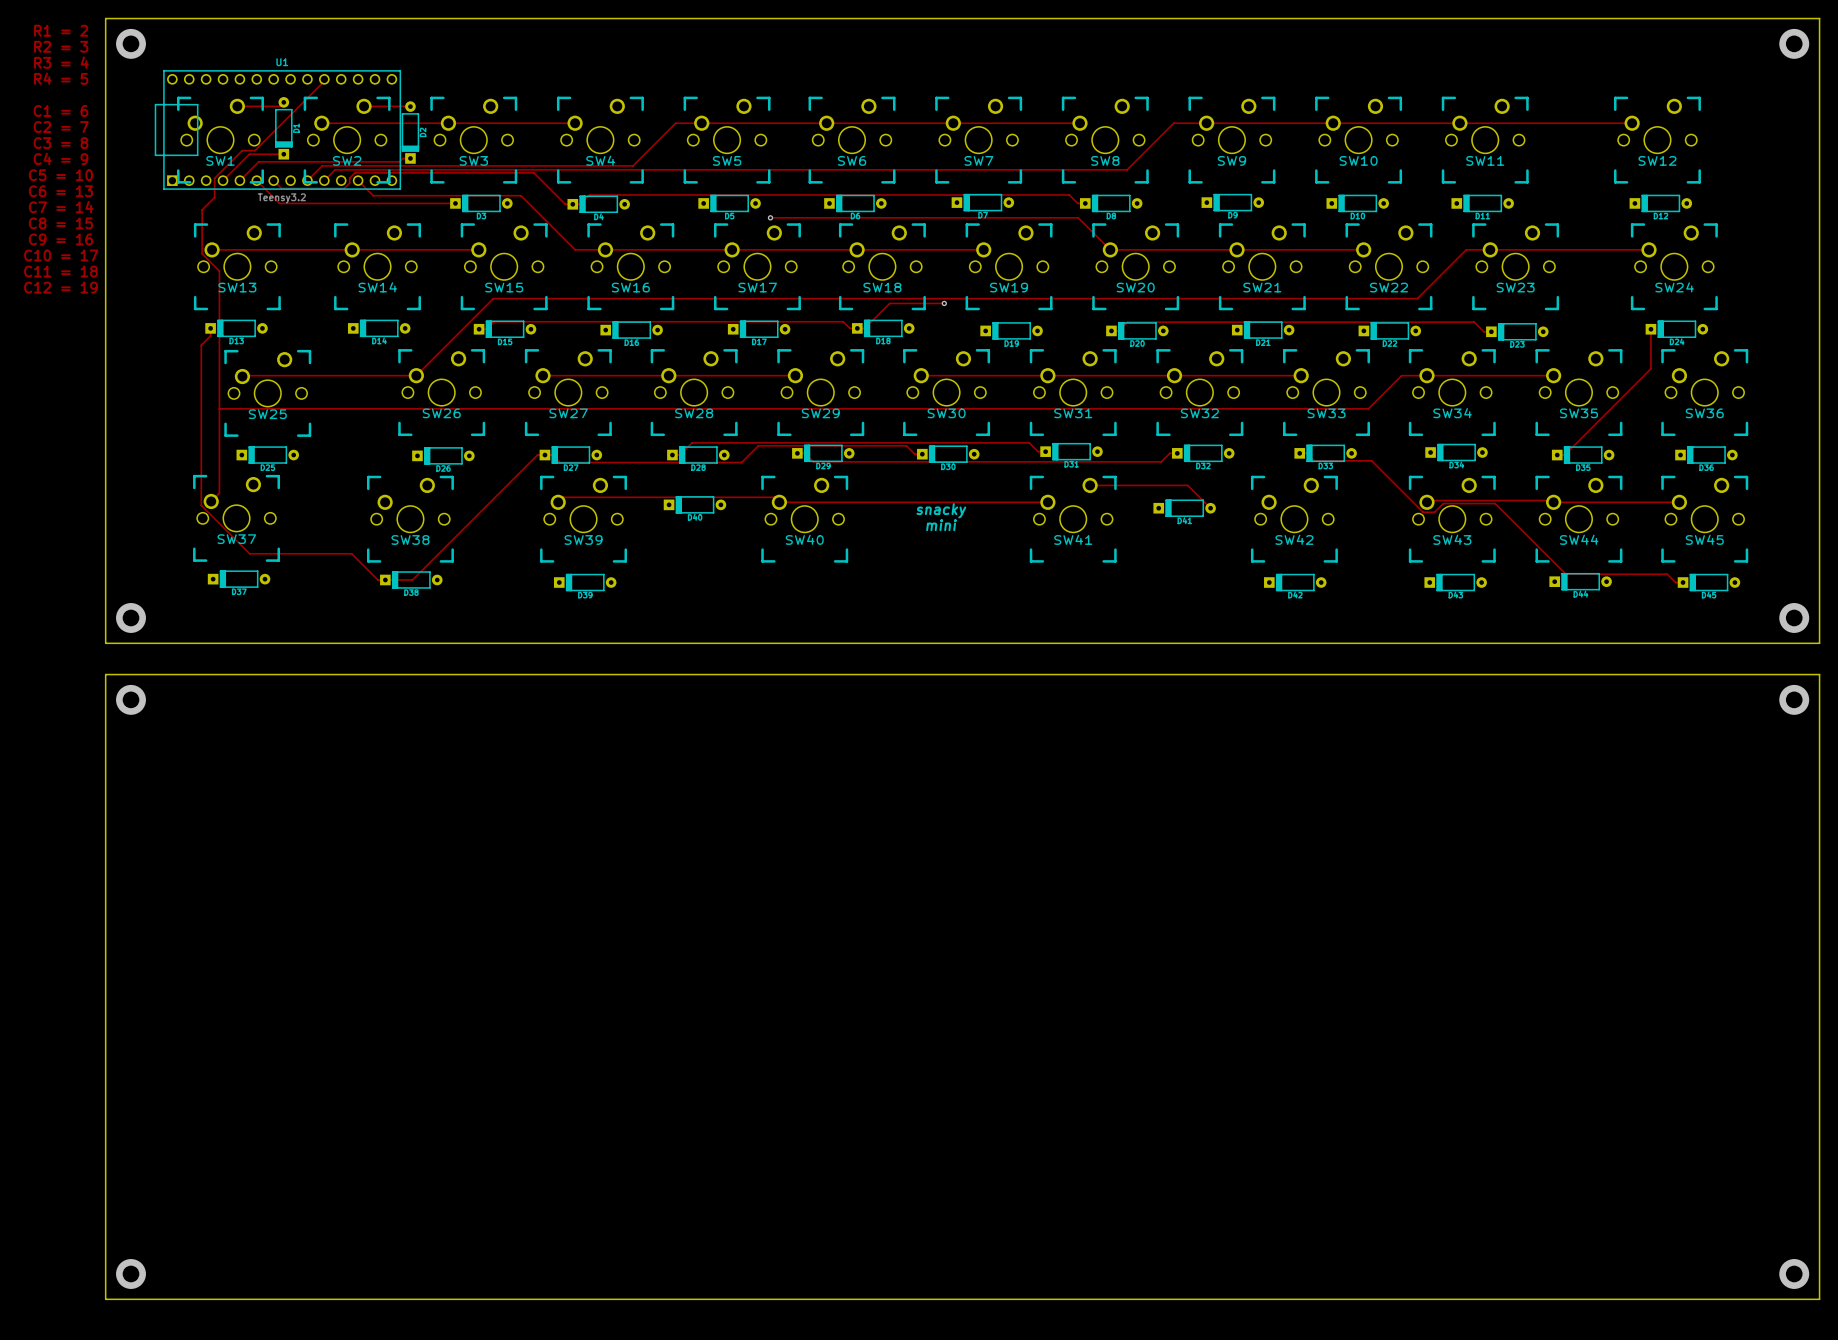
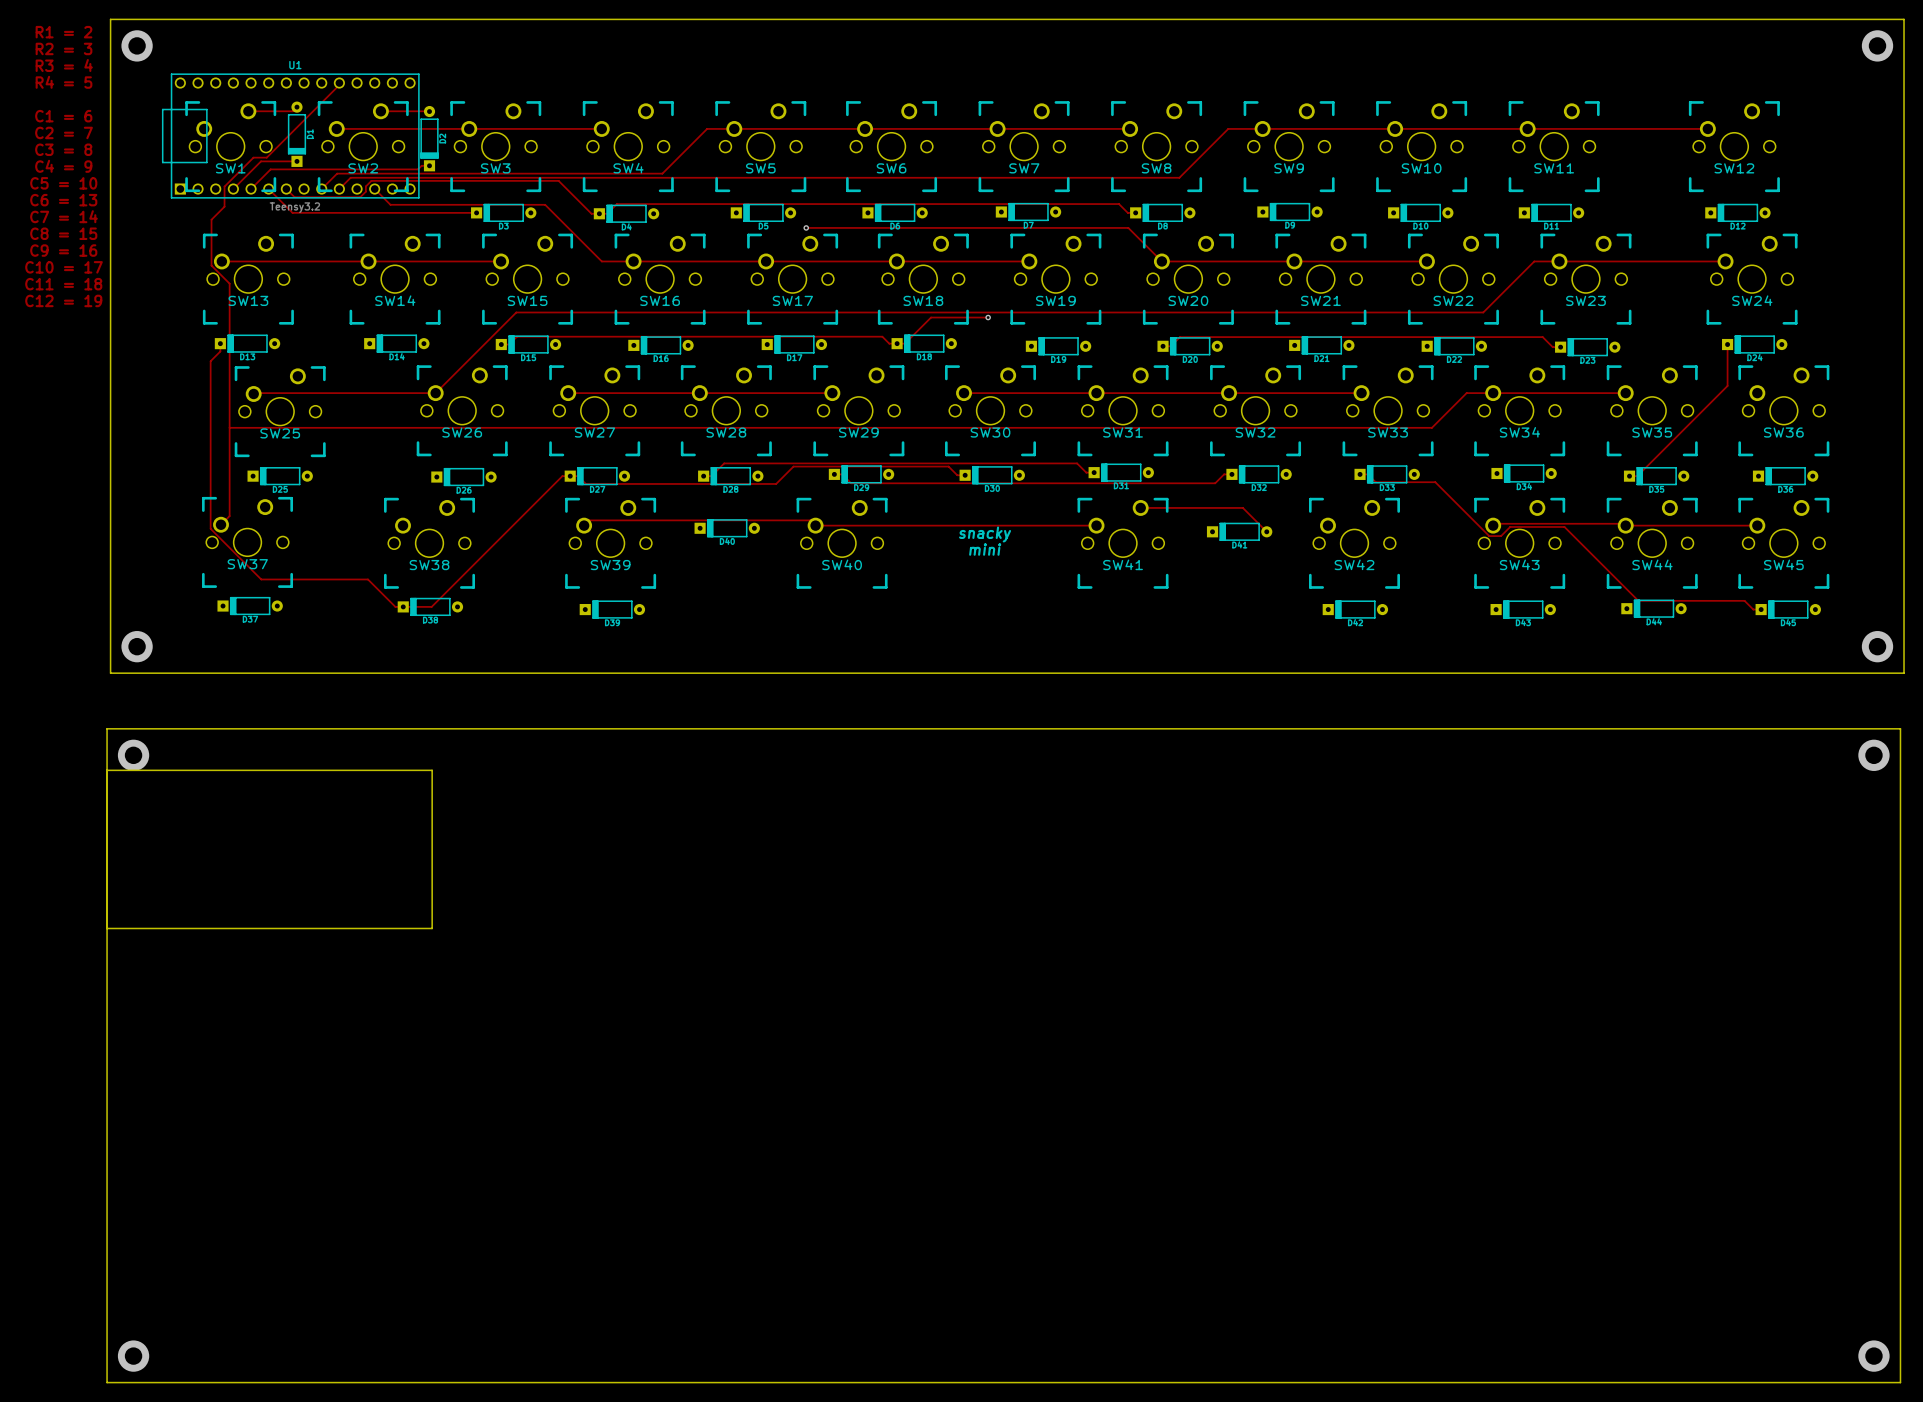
board edge: (105, 674) (1819, 674) (1819, 1299) (105, 1299) (105, 674) -> (107, 728) (1900, 728) (1900, 1382) (107, 1382) (107, 728)
via position: (131, 699) -> (133, 755)
via position: (1794, 699) -> (1873, 755)
board edge: none -> (107, 770) (432, 770) (432, 928) (107, 928)
via position: (131, 1273) -> (133, 1356)
via position: (1794, 1273) -> (1873, 1356)

